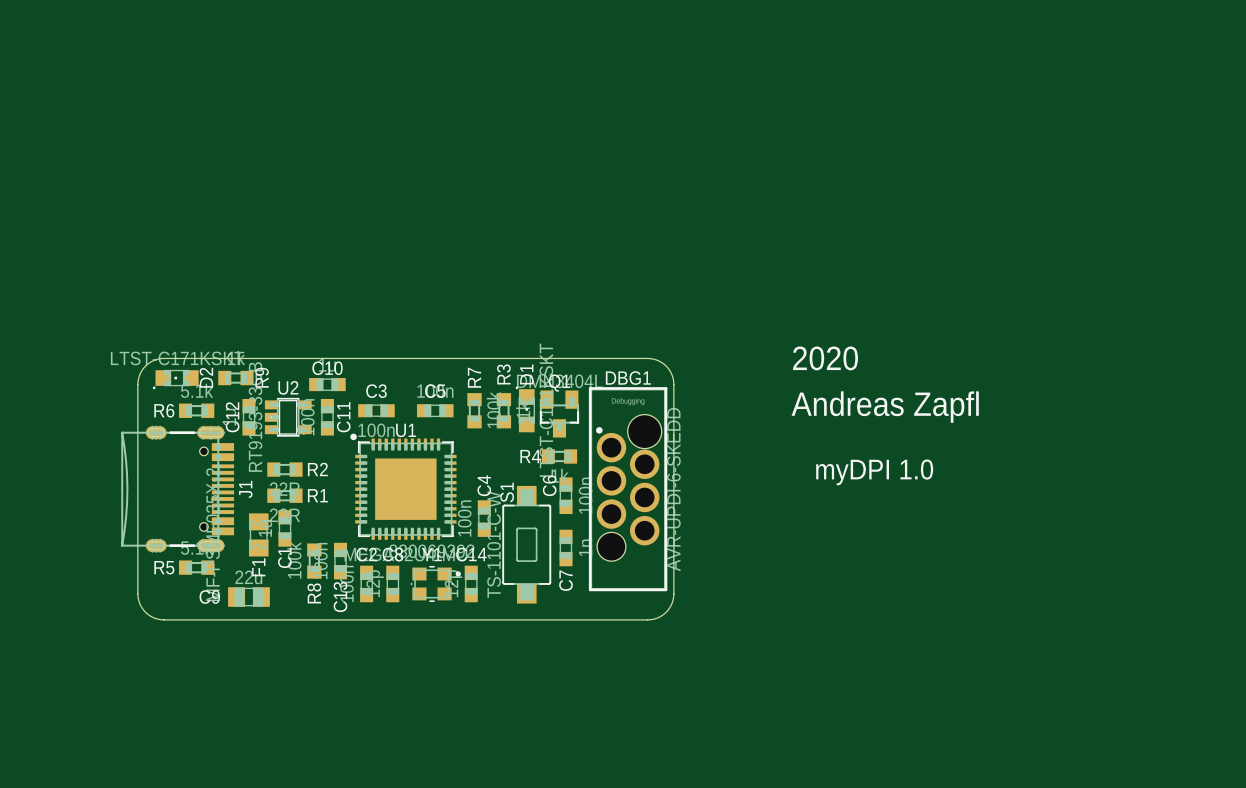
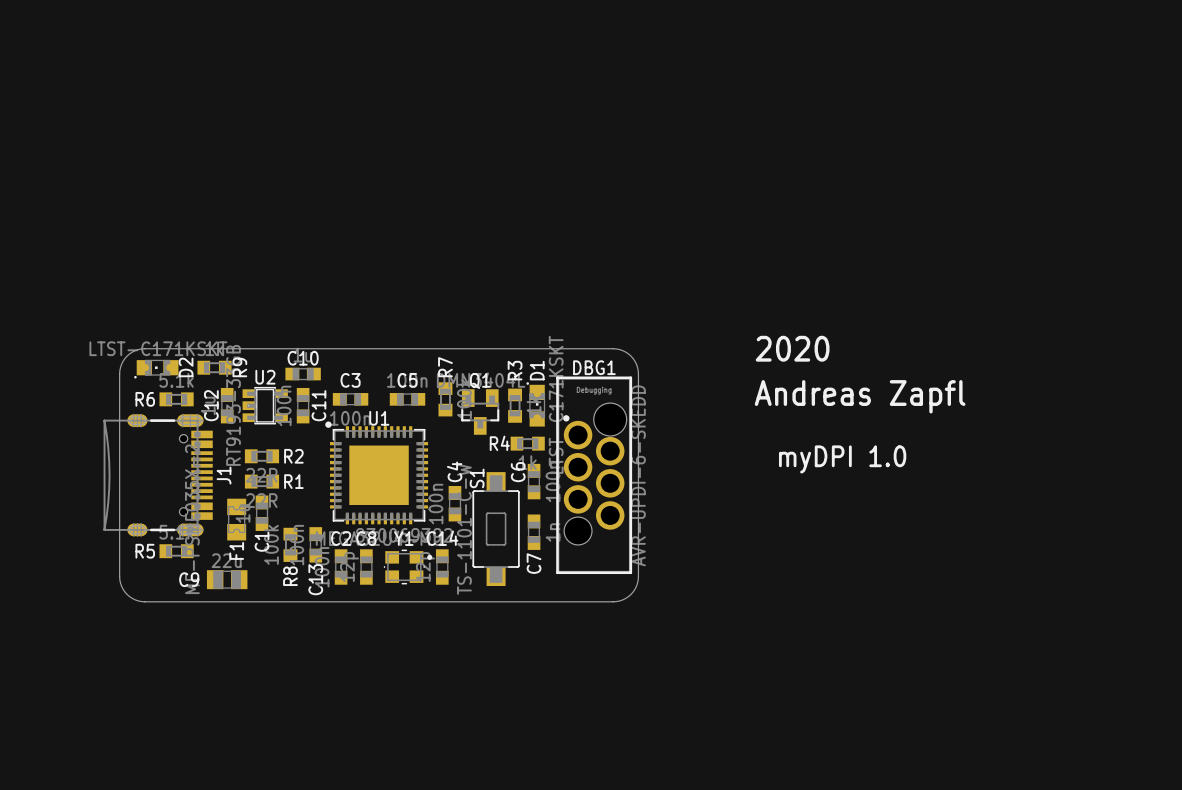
D1 position: (525, 409) -> (535, 404)
R3 position: (503, 410) -> (515, 405)
Q1 position: (559, 414) -> (480, 412)

